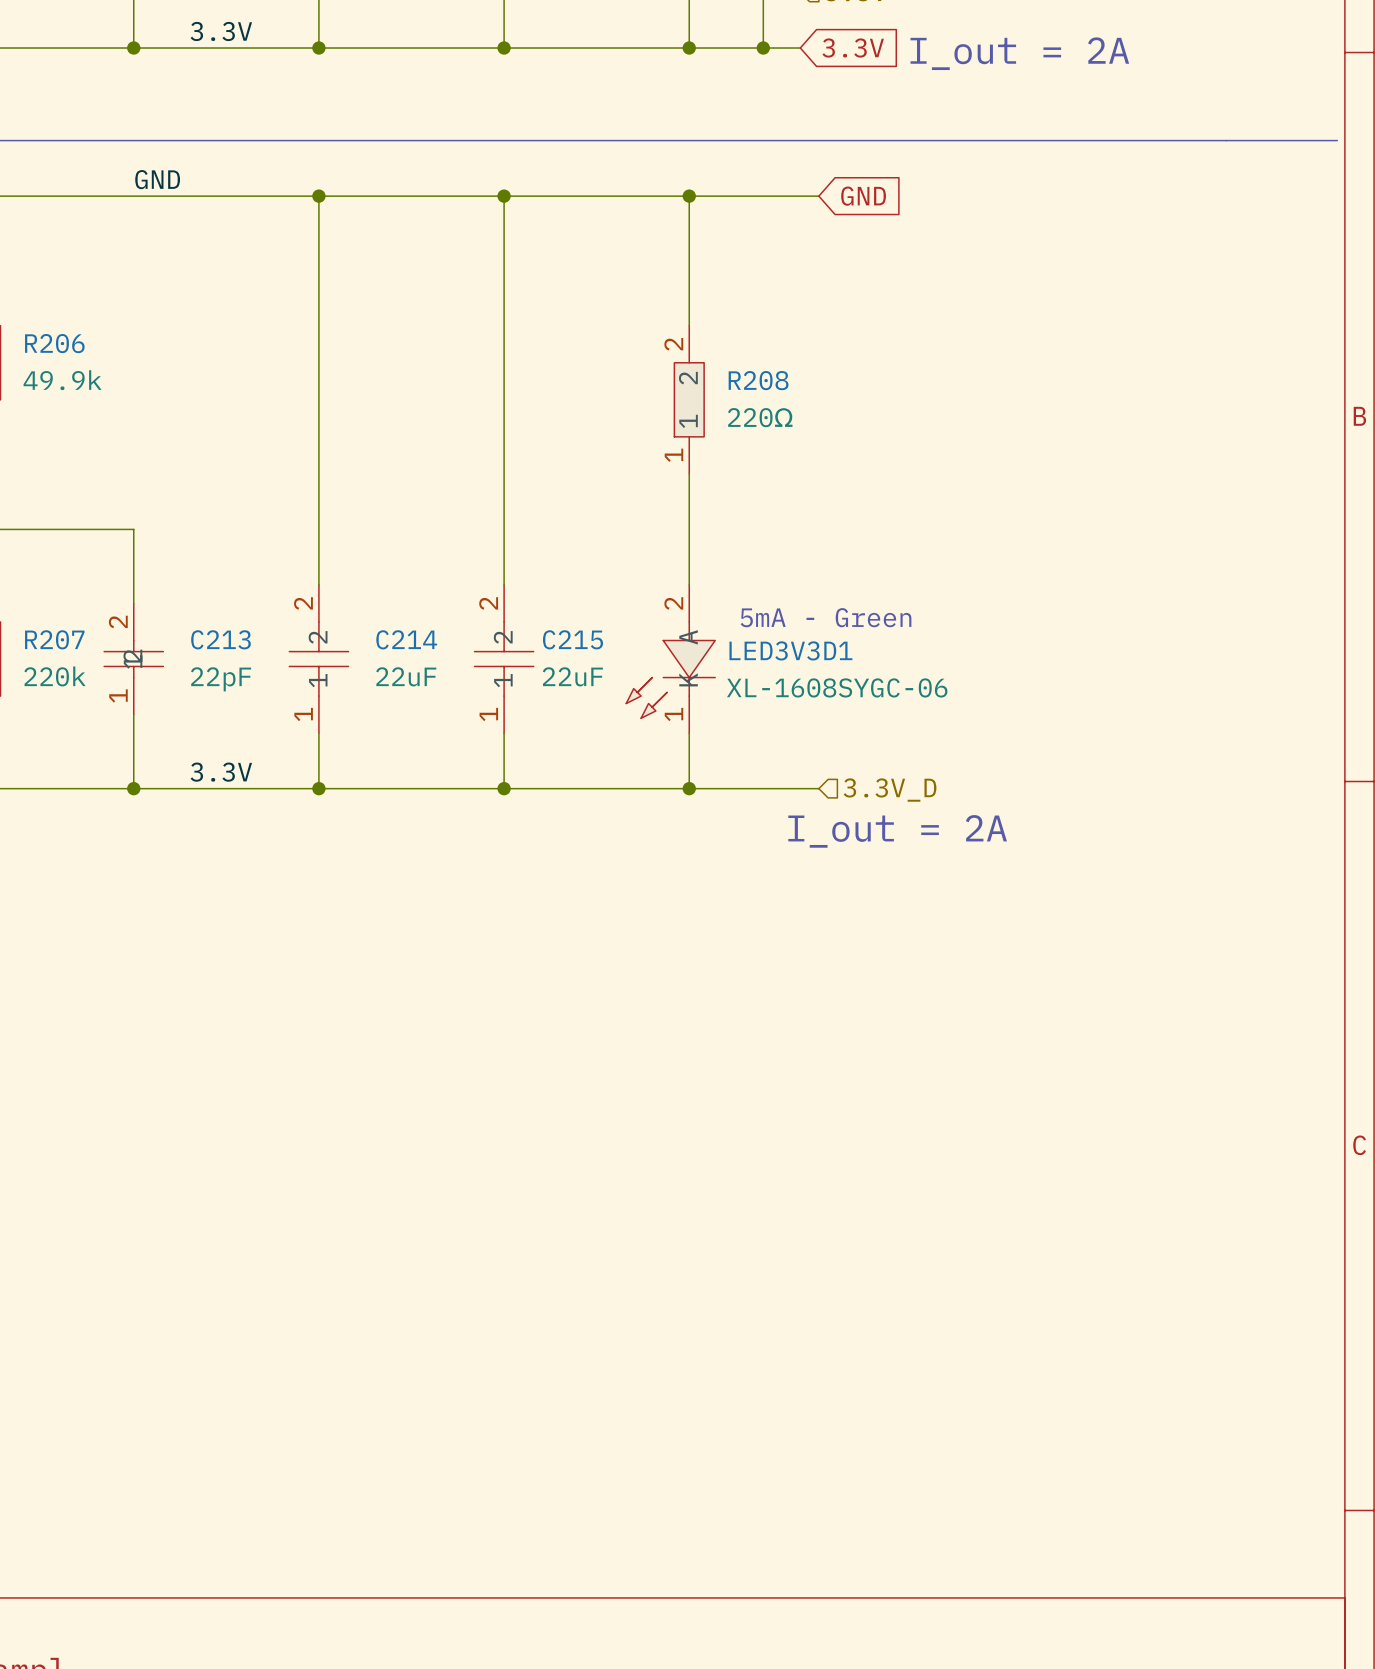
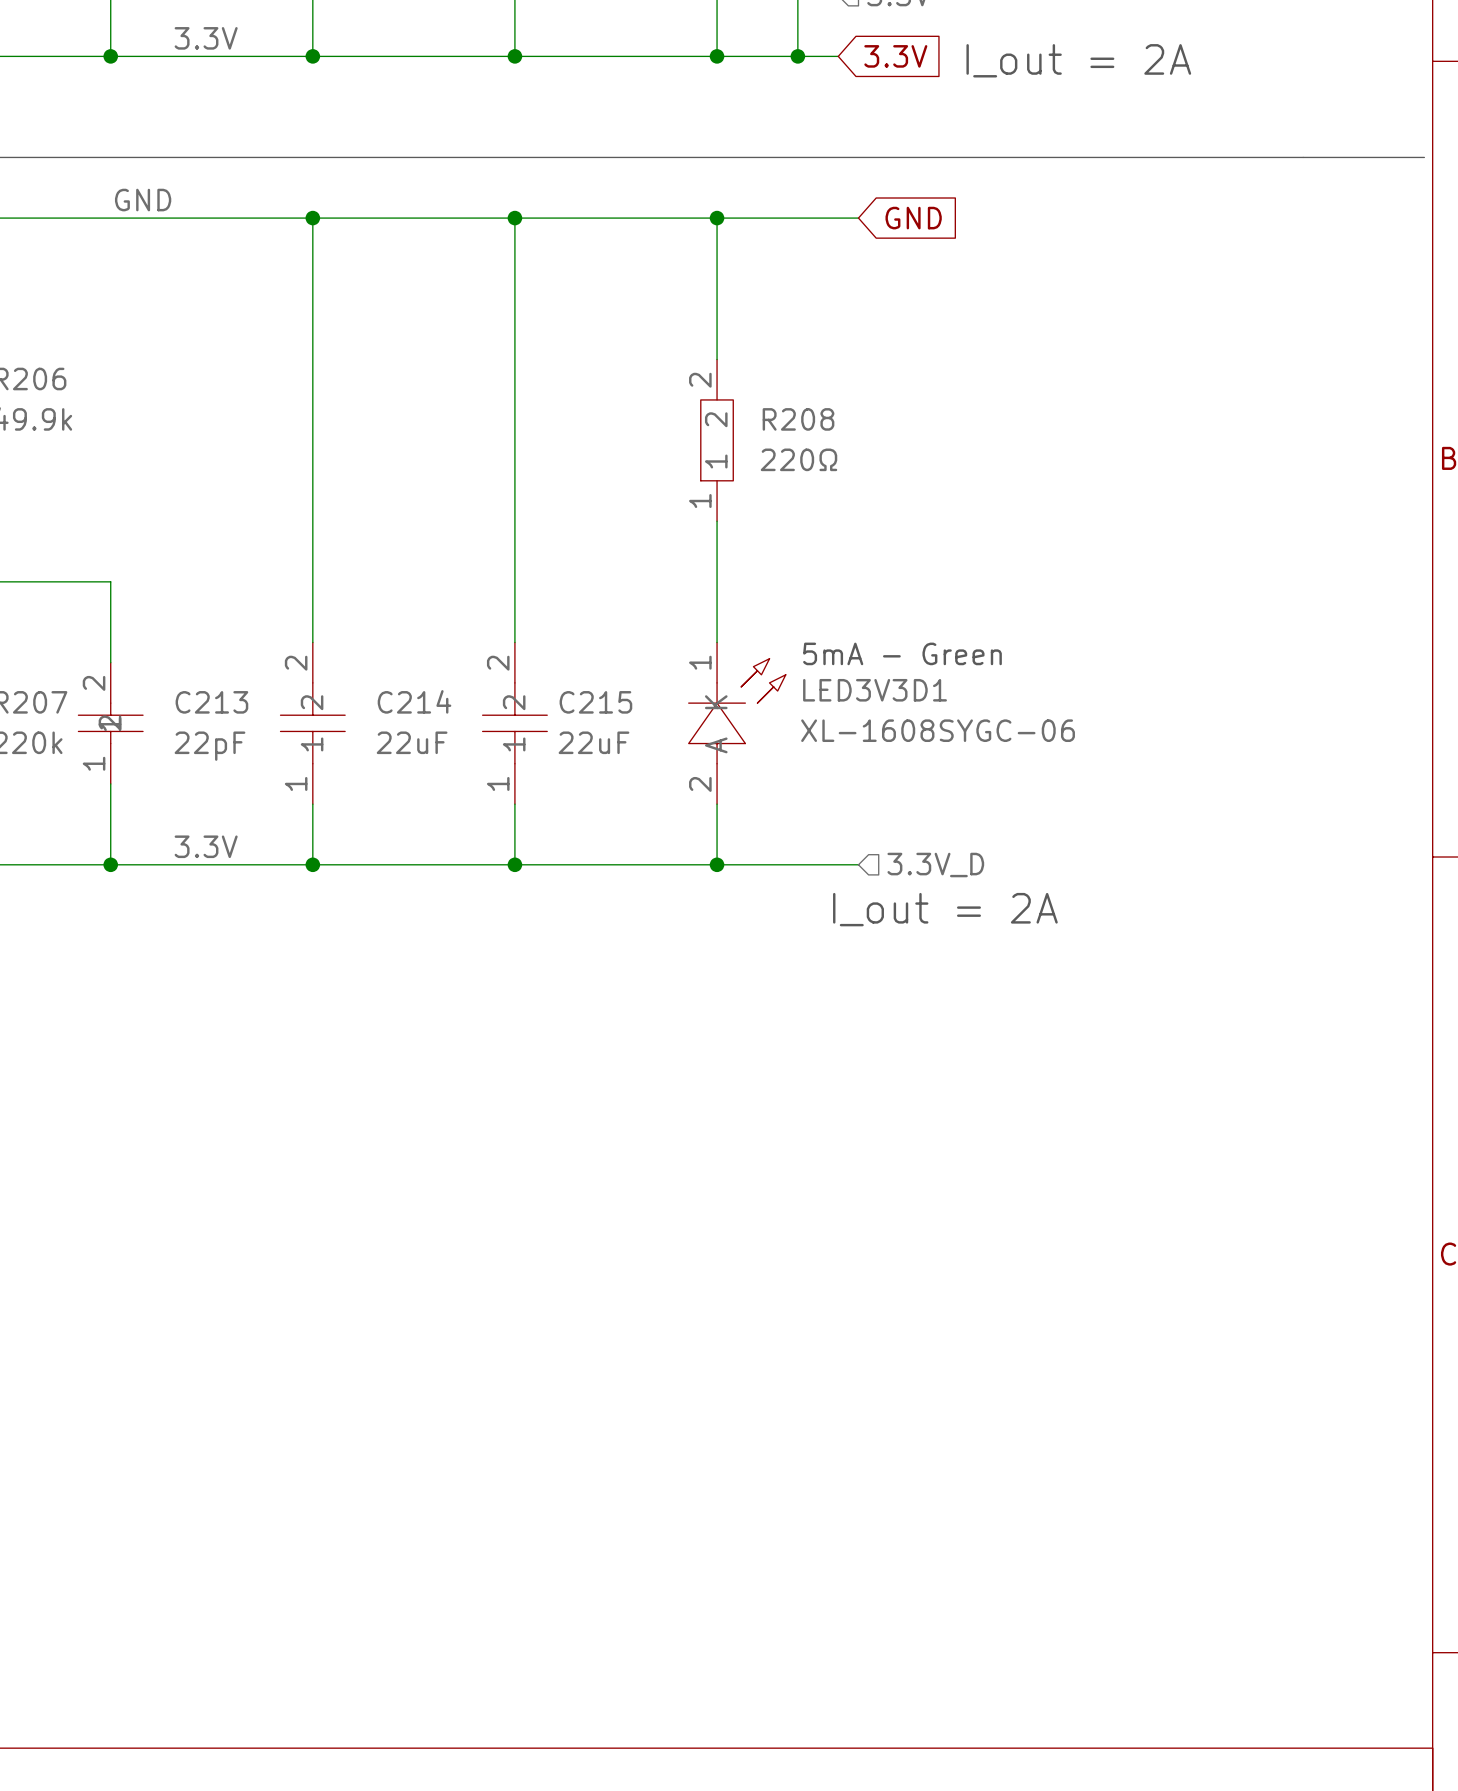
text position: 5mA - Green (826, 617) -> 5mA - Green (902, 653)
LED3V3D1 rotation: 0° (670, 670) -> 180° (737, 711)

